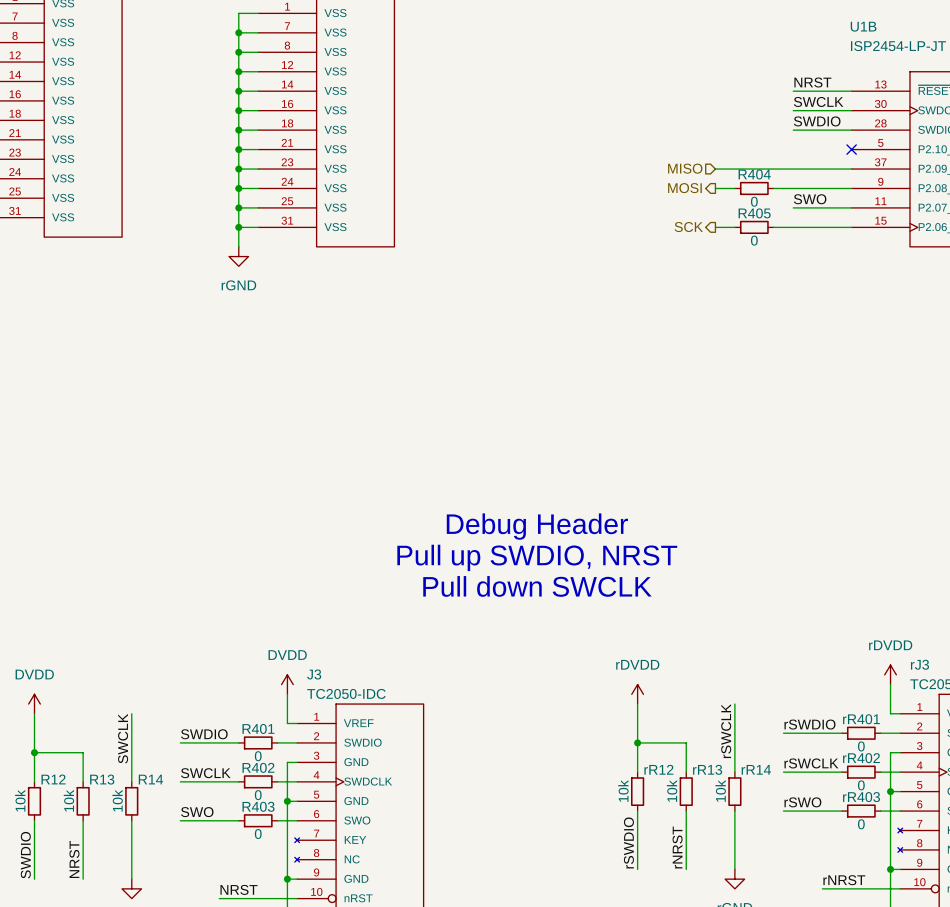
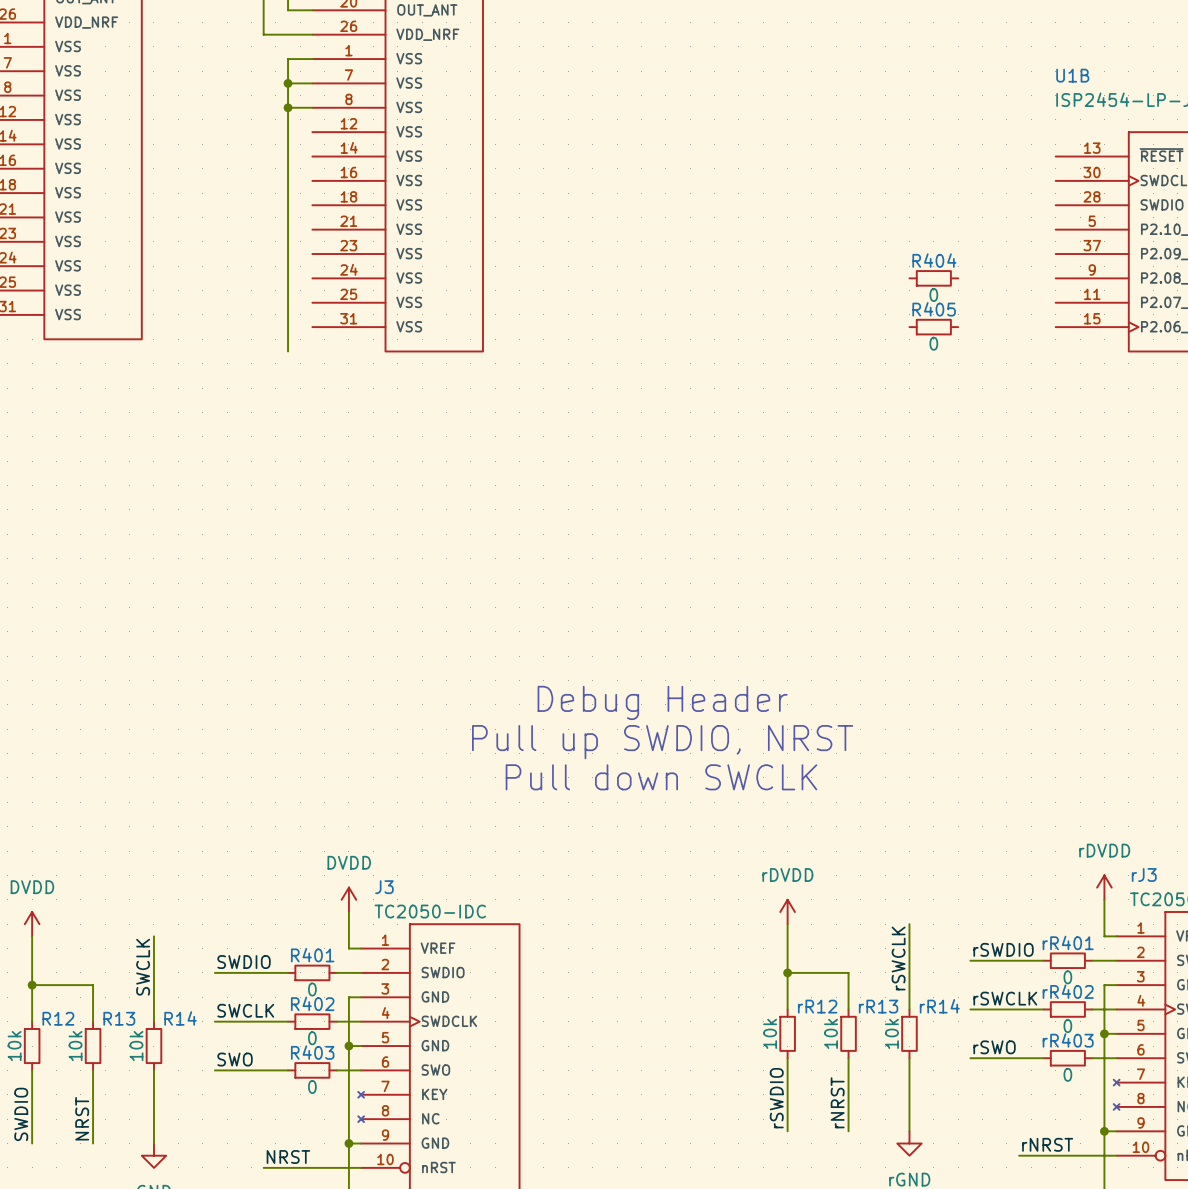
wire: (238, 71) (258, 71) -> none
junction: (238, 71) -> none
label: NRST (812, 82) -> none
wire: (238, 91) (258, 91) -> none
junction: (238, 91) -> none
wire: (793, 91) (851, 91) -> none
label: SWCLK (818, 101) -> none
wire: (238, 110) (258, 110) -> none
junction: (238, 110) -> none
wire: (793, 110) (851, 110) -> none
label: SWDIO (817, 121) -> none
wire: (238, 130) (258, 130) -> none
junction: (238, 130) -> none
wire: (793, 130) (851, 130) -> none
wire: (238, 149) (258, 149) -> none
junction: (238, 149) -> none
no-connect mark: (851, 149) -> none
hierarchical label: MISO (685, 168) -> none
wire: (238, 169) (258, 169) -> none
junction: (238, 169) -> none
wire: (715, 169) (851, 169) -> none
wire: (238, 188) (258, 188) -> none
junction: (238, 188) -> none
hierarchical label: MOSI (684, 188) -> none
wire: (715, 188) (734, 188) -> none
wire: (773, 188) (851, 188) -> none
label: SWO (810, 199) -> none
wire: (238, 207) (258, 207) -> none
junction: (238, 207) -> none
wire: (793, 207) (851, 207) -> none
wire: (238, 227) (258, 227) -> none
junction: (238, 227) -> none
hierarchical label: SCK (688, 227) -> none
wire: (715, 227) (734, 227) -> none
wire: (773, 227) (851, 227) -> none
power symbol: rGND (238, 256) -> none

